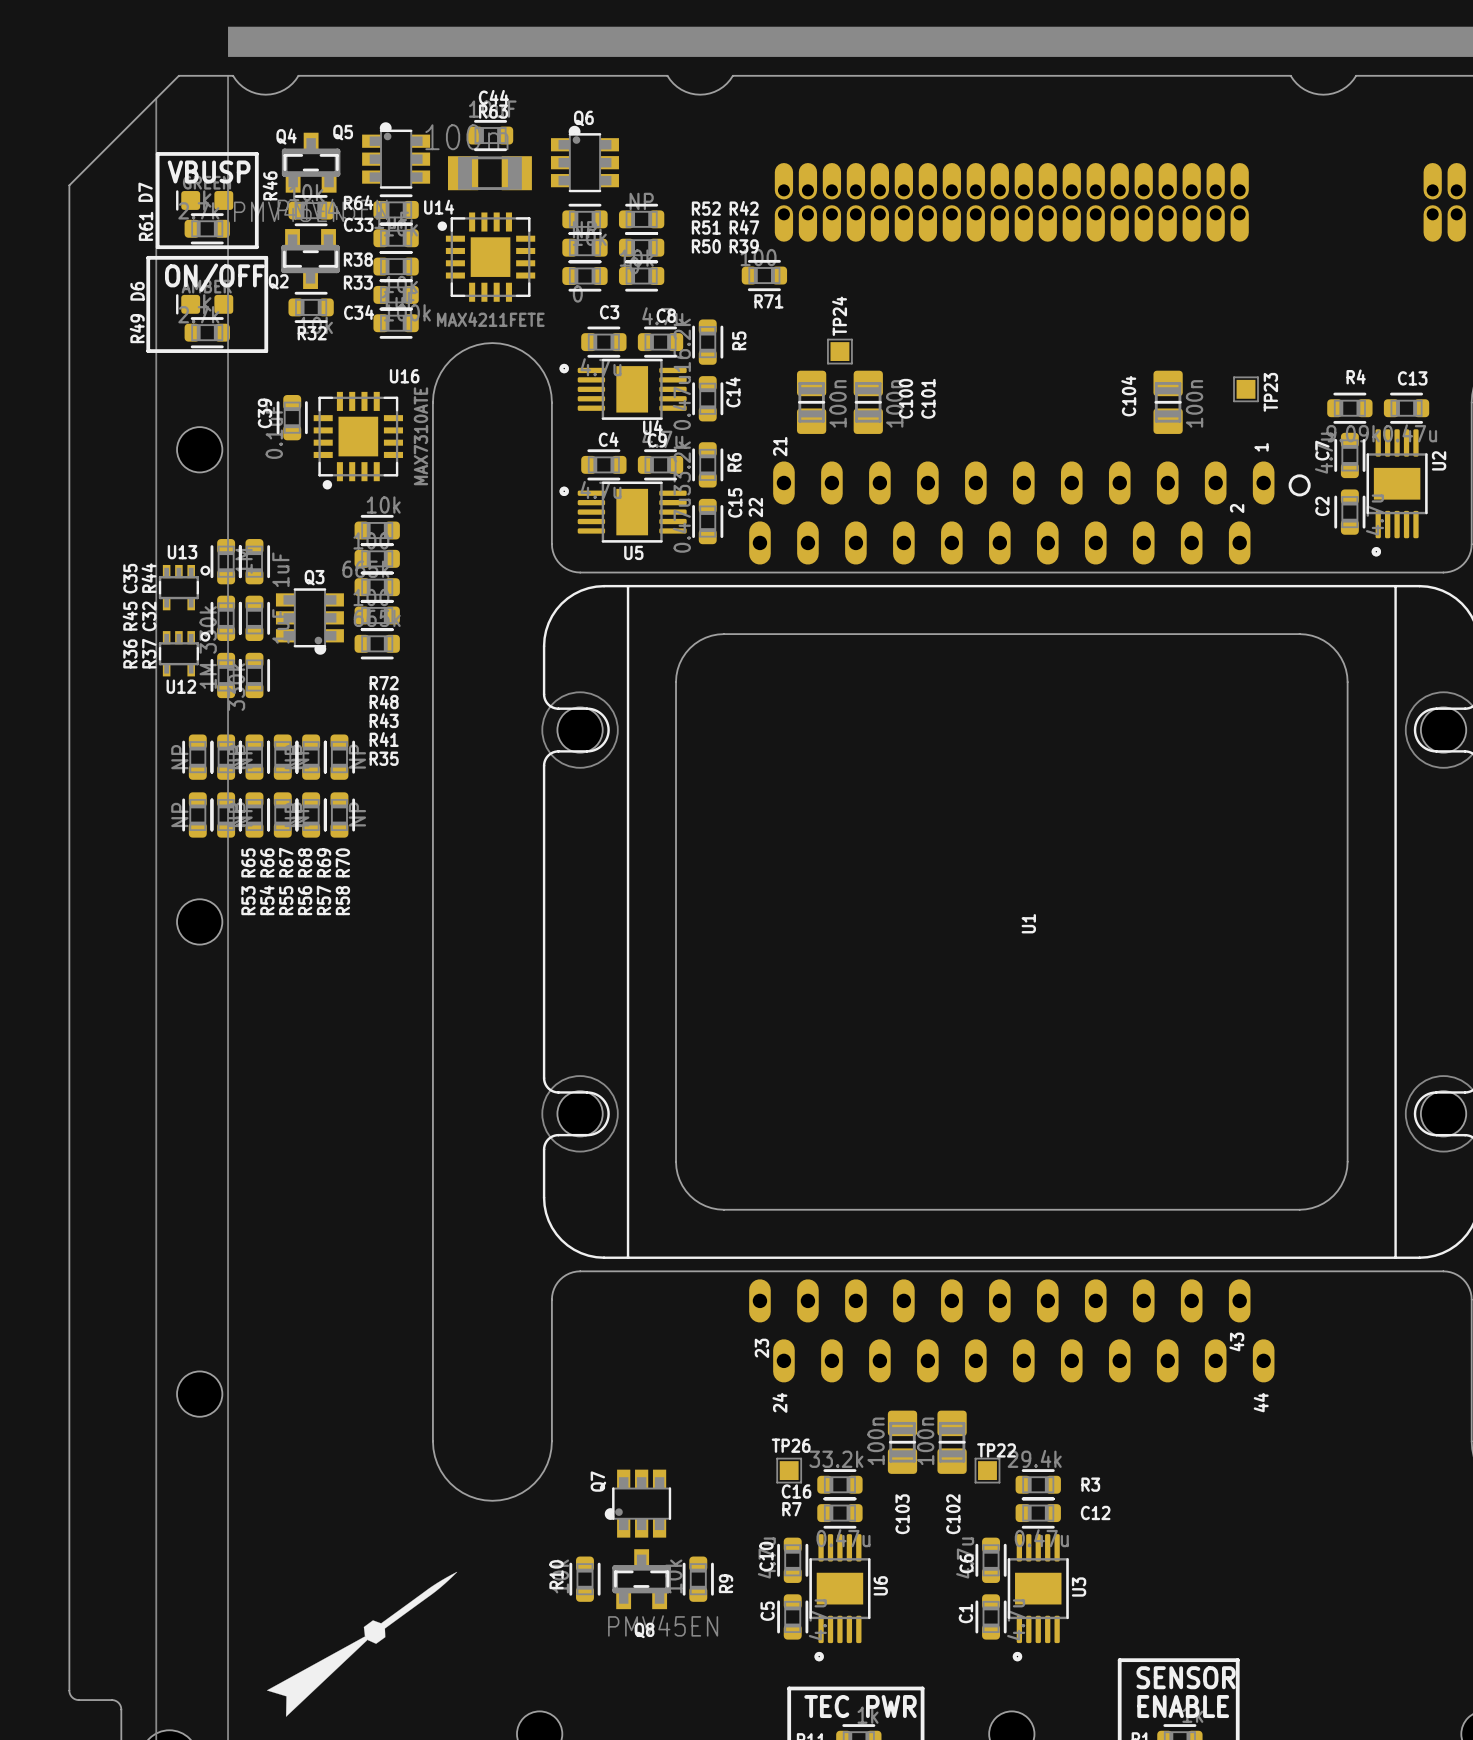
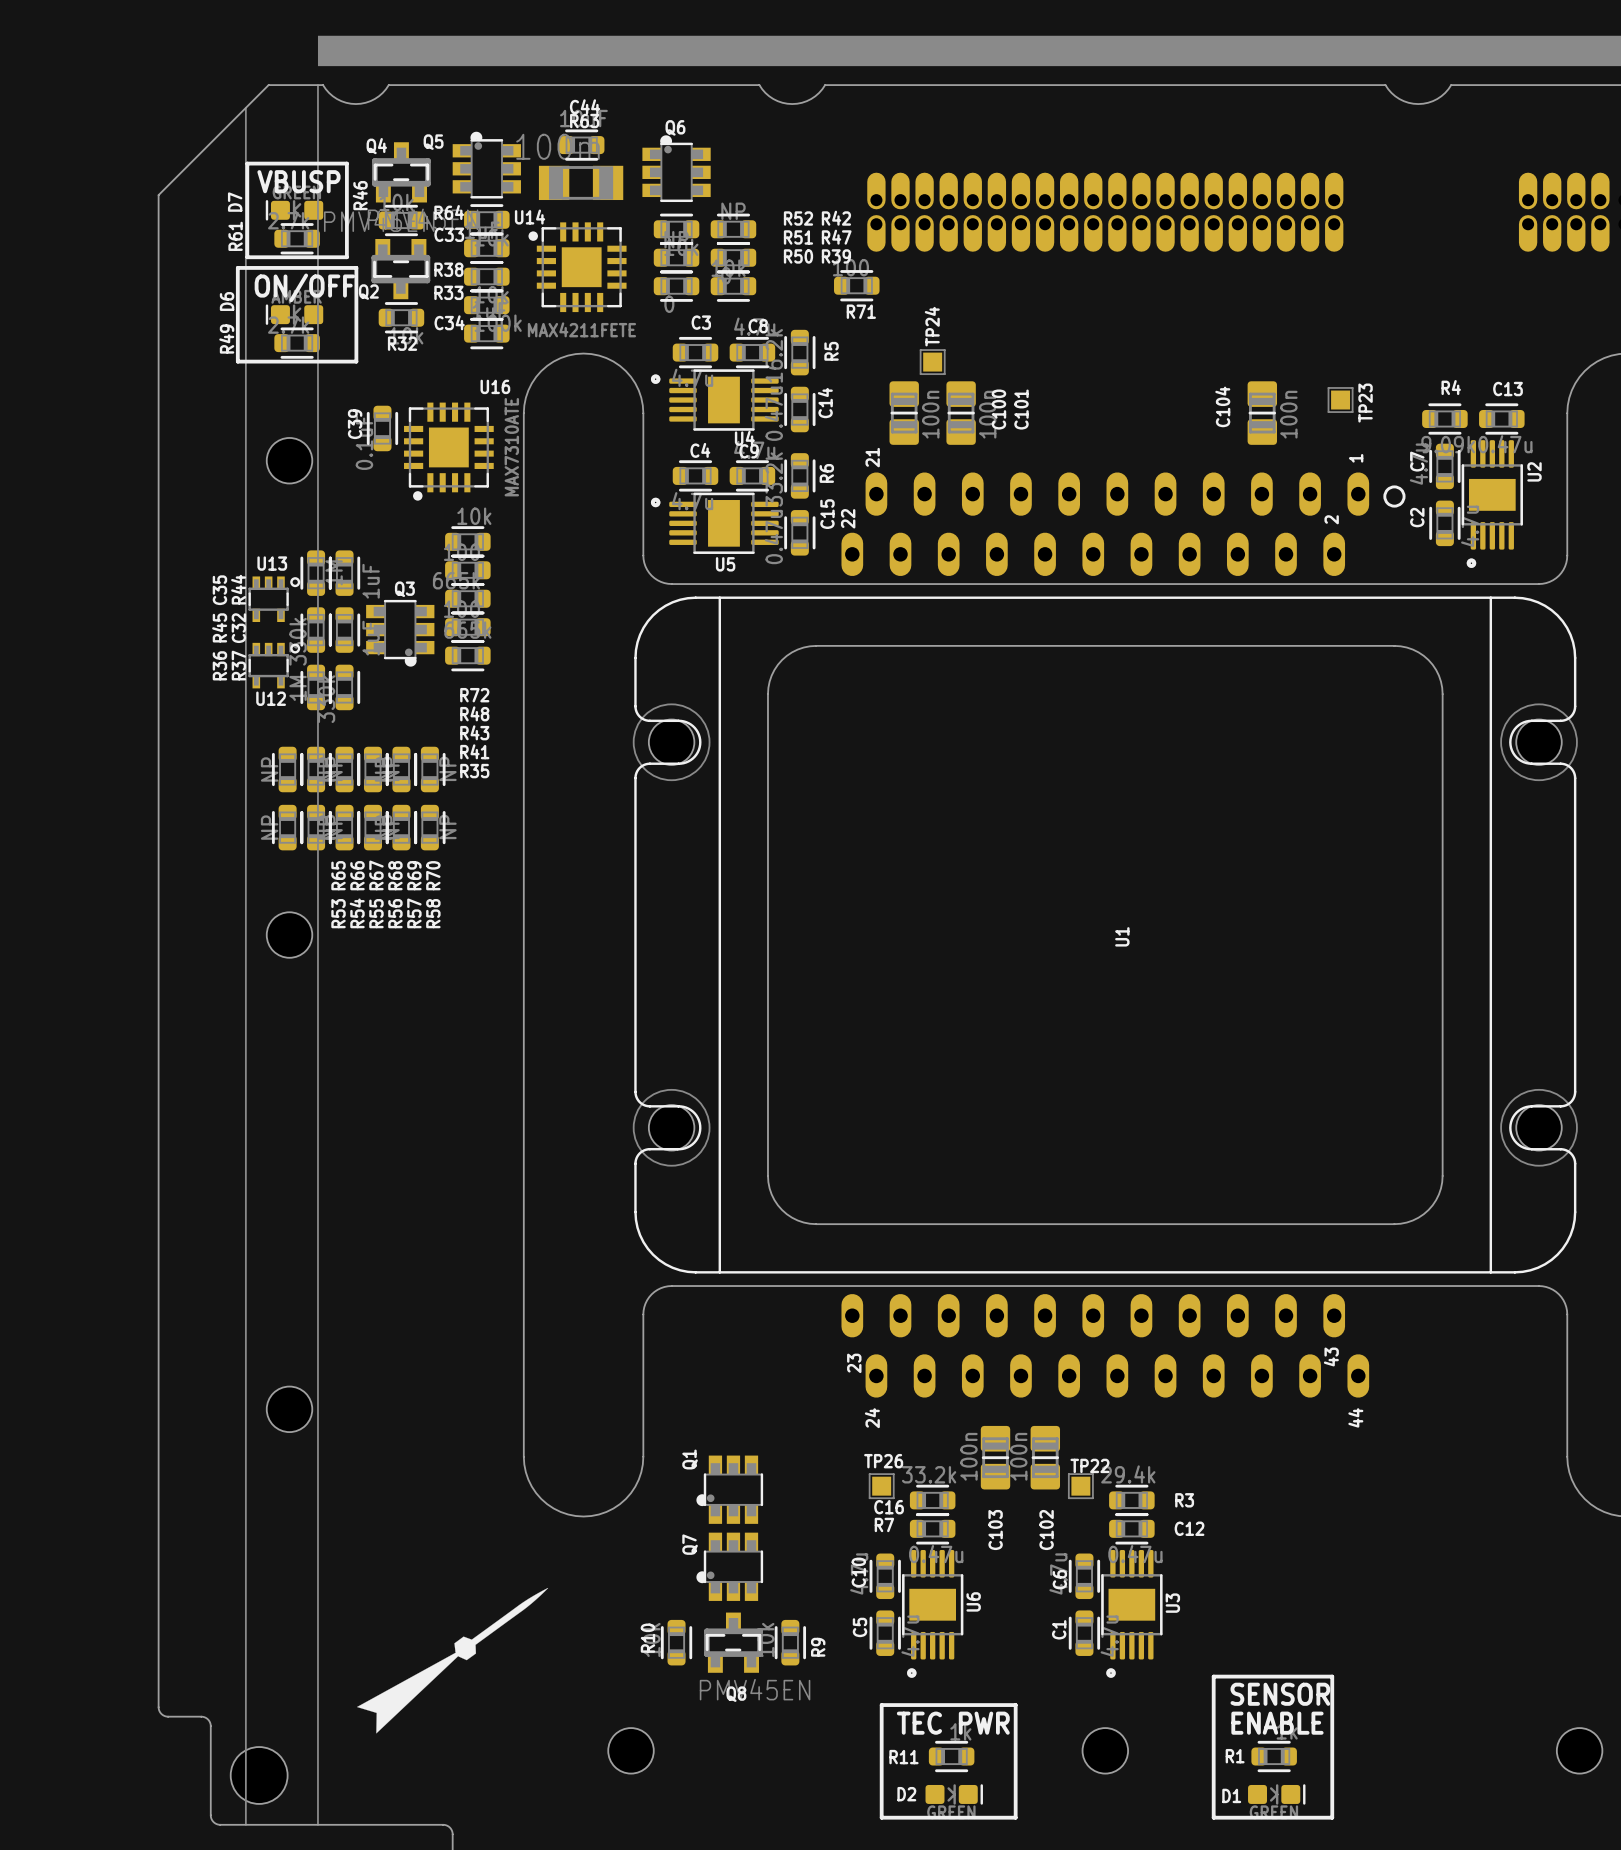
Q1: none -> (729, 1489)
Q7 position: (637, 1503) -> (729, 1566)
R10 position: (584, 1579) -> (676, 1642)
Q8 position: (641, 1579) -> (733, 1642)
R9 position: (698, 1579) -> (790, 1642)

